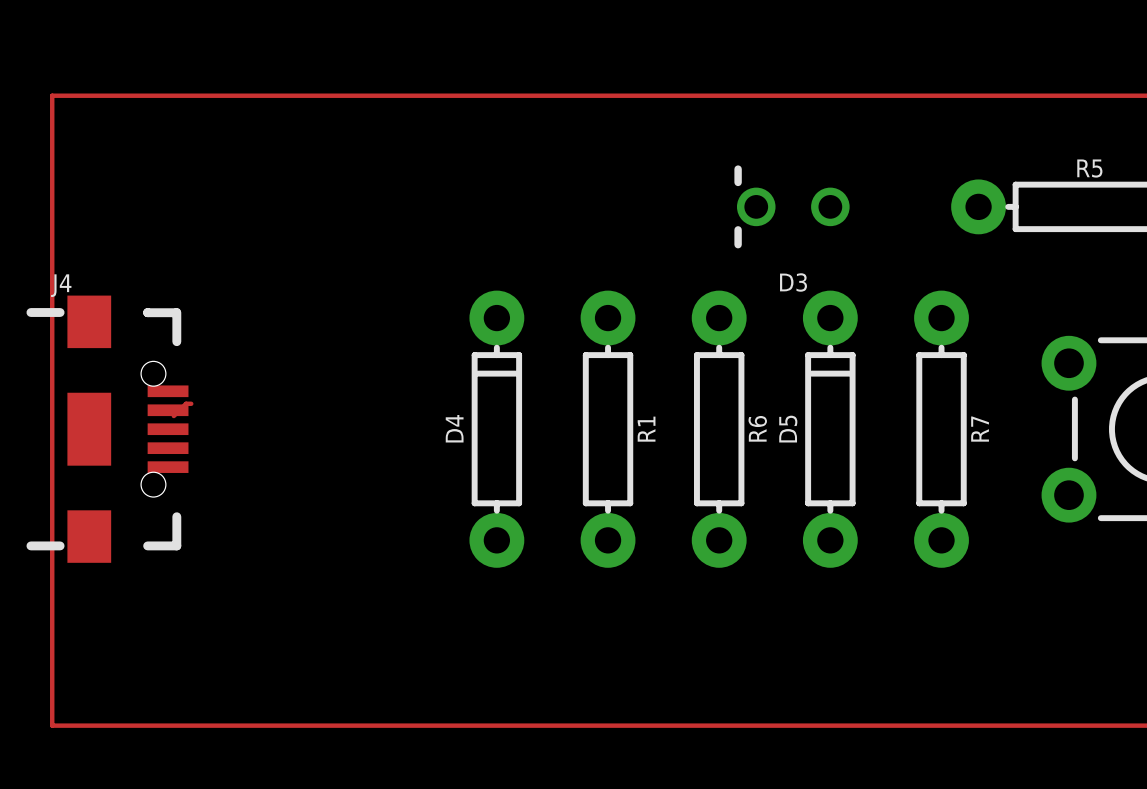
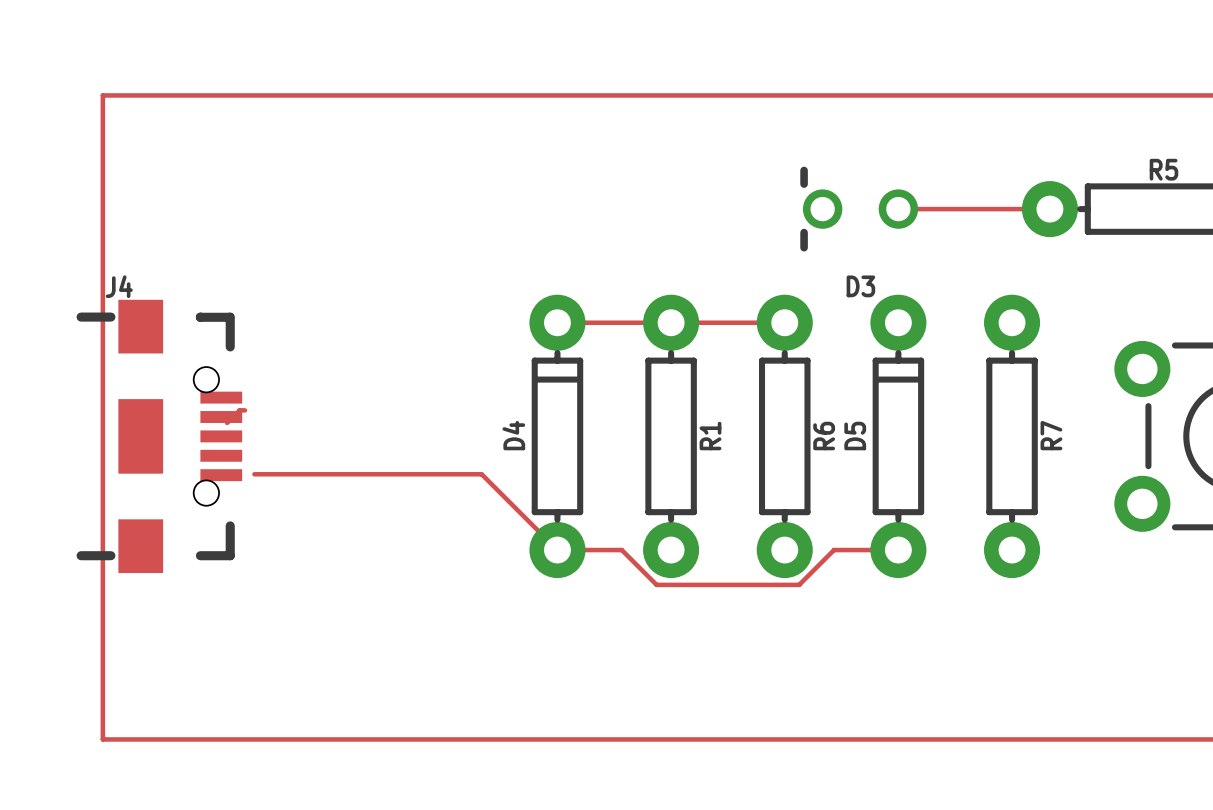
top track: none -> (898, 209) (1049, 209)
top track: none -> (557, 322) (784, 322)
top track: none -> (254, 474) (481, 474) (557, 550) (621, 550) (656, 584) (799, 584) (834, 550) (898, 550)

